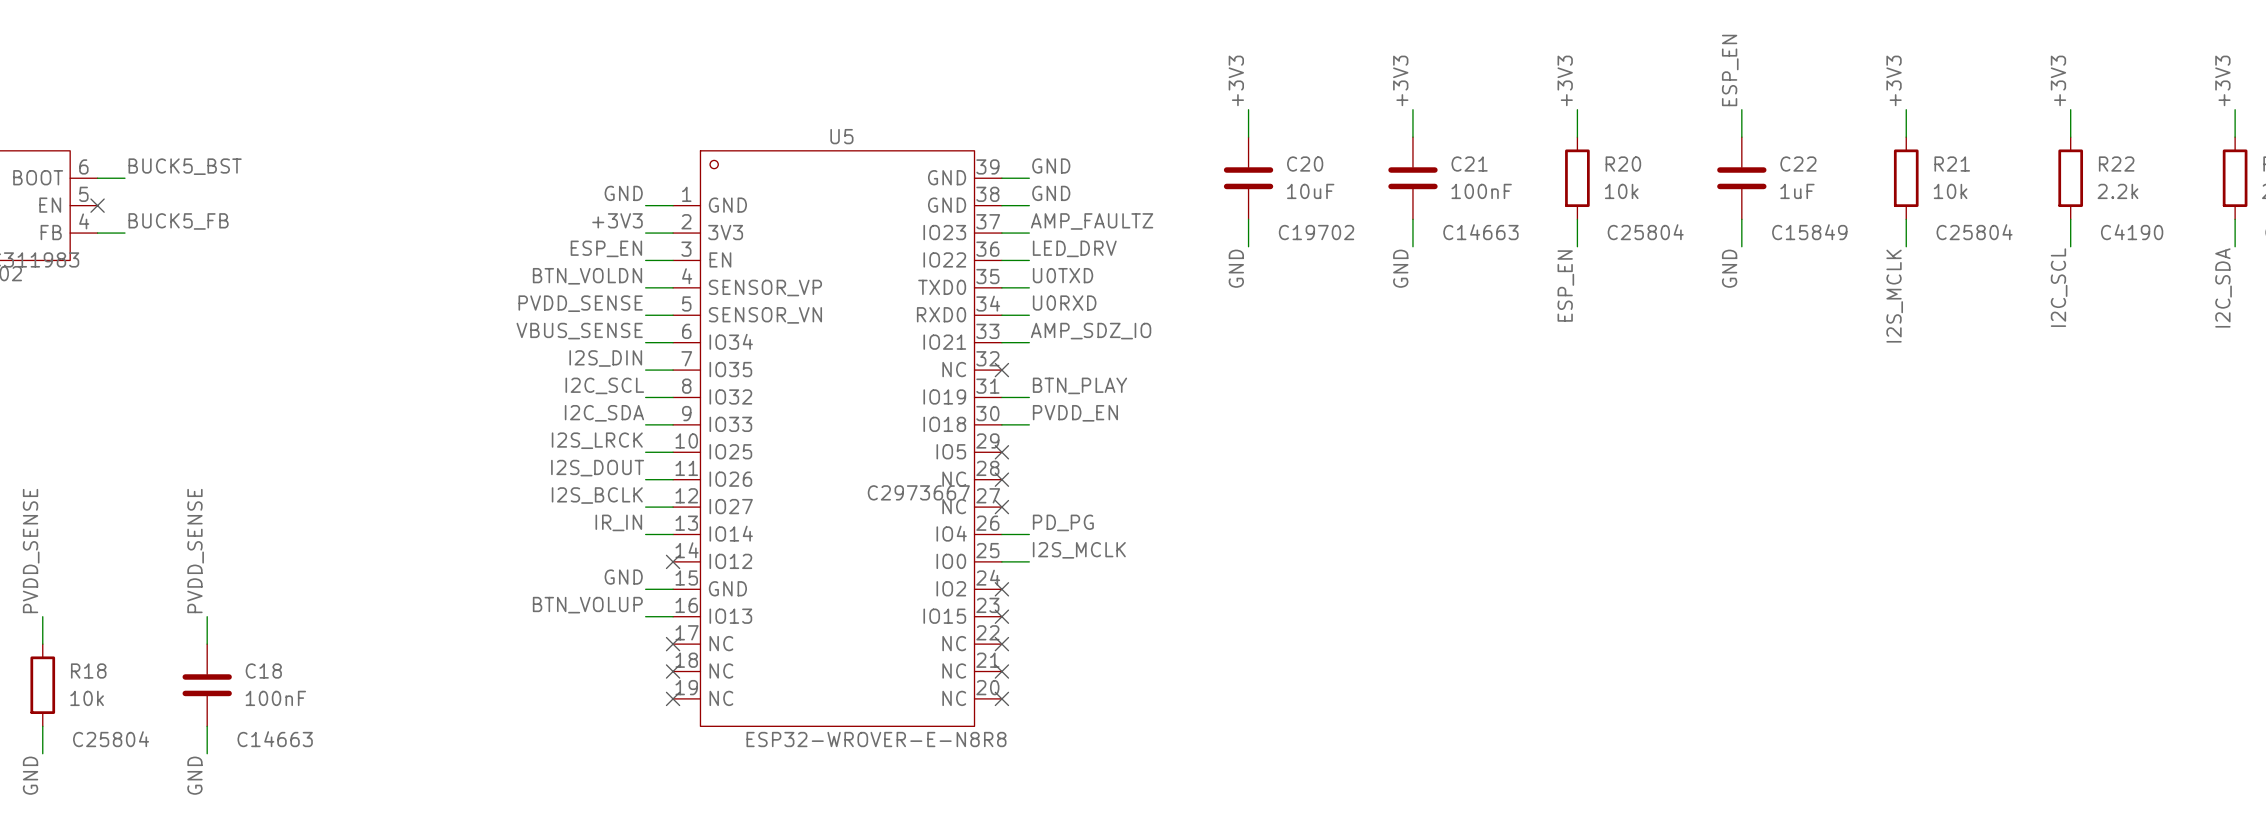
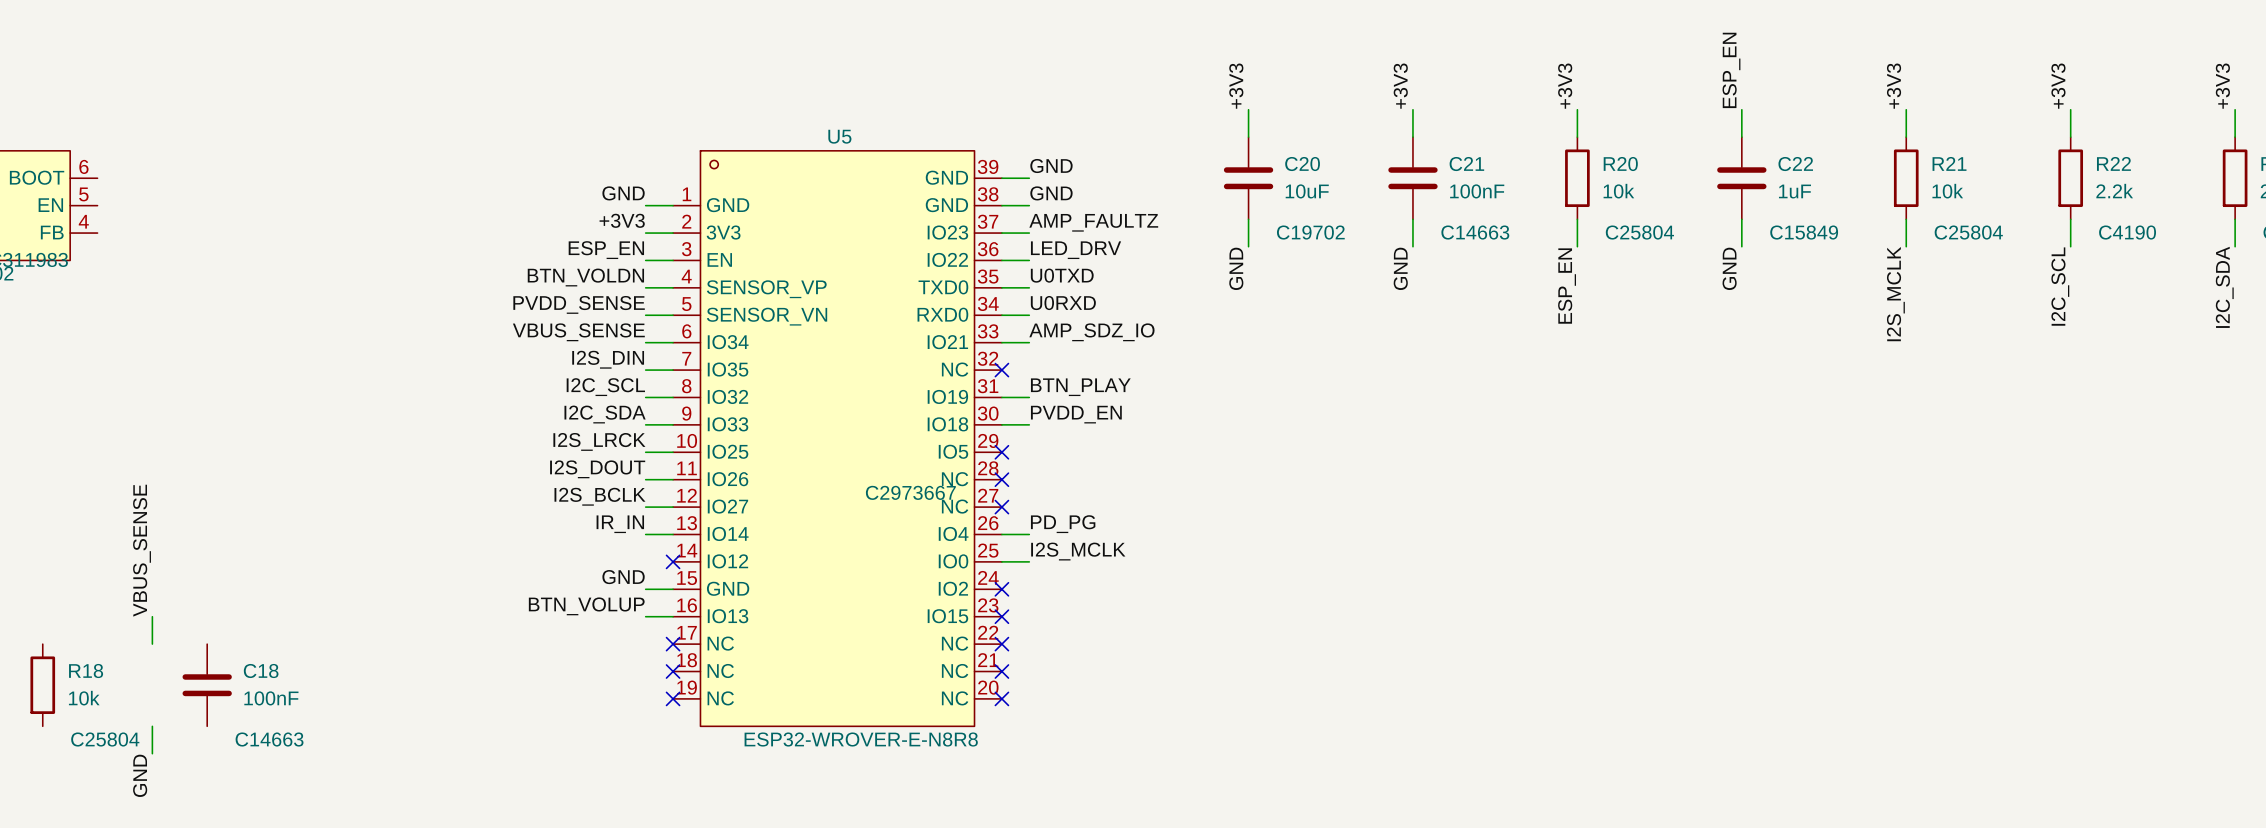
label: BUCK5_BST (185, 166) -> none
wire: (97, 178) (124, 178) -> none
no-connect mark: (97, 205) -> none
label: BUCK5_FB (178, 221) -> none
wire: (97, 233) (124, 233) -> none
label: PVDD_SENSE (31, 551) -> none
label: PVDD_SENSE (195, 551) -> none
label: none -> VBUS_SENSE (142, 550)
wire: (42, 616) (42, 644) -> (152, 616) (152, 644)
wire: (207, 616) (207, 644) -> none
wire: (42, 726) (42, 753) -> (152, 726) (152, 753)
wire: (207, 726) (207, 753) -> none
label: GND (30, 775) -> none
label: none -> GND (140, 775)
label: GND (194, 775) -> none

